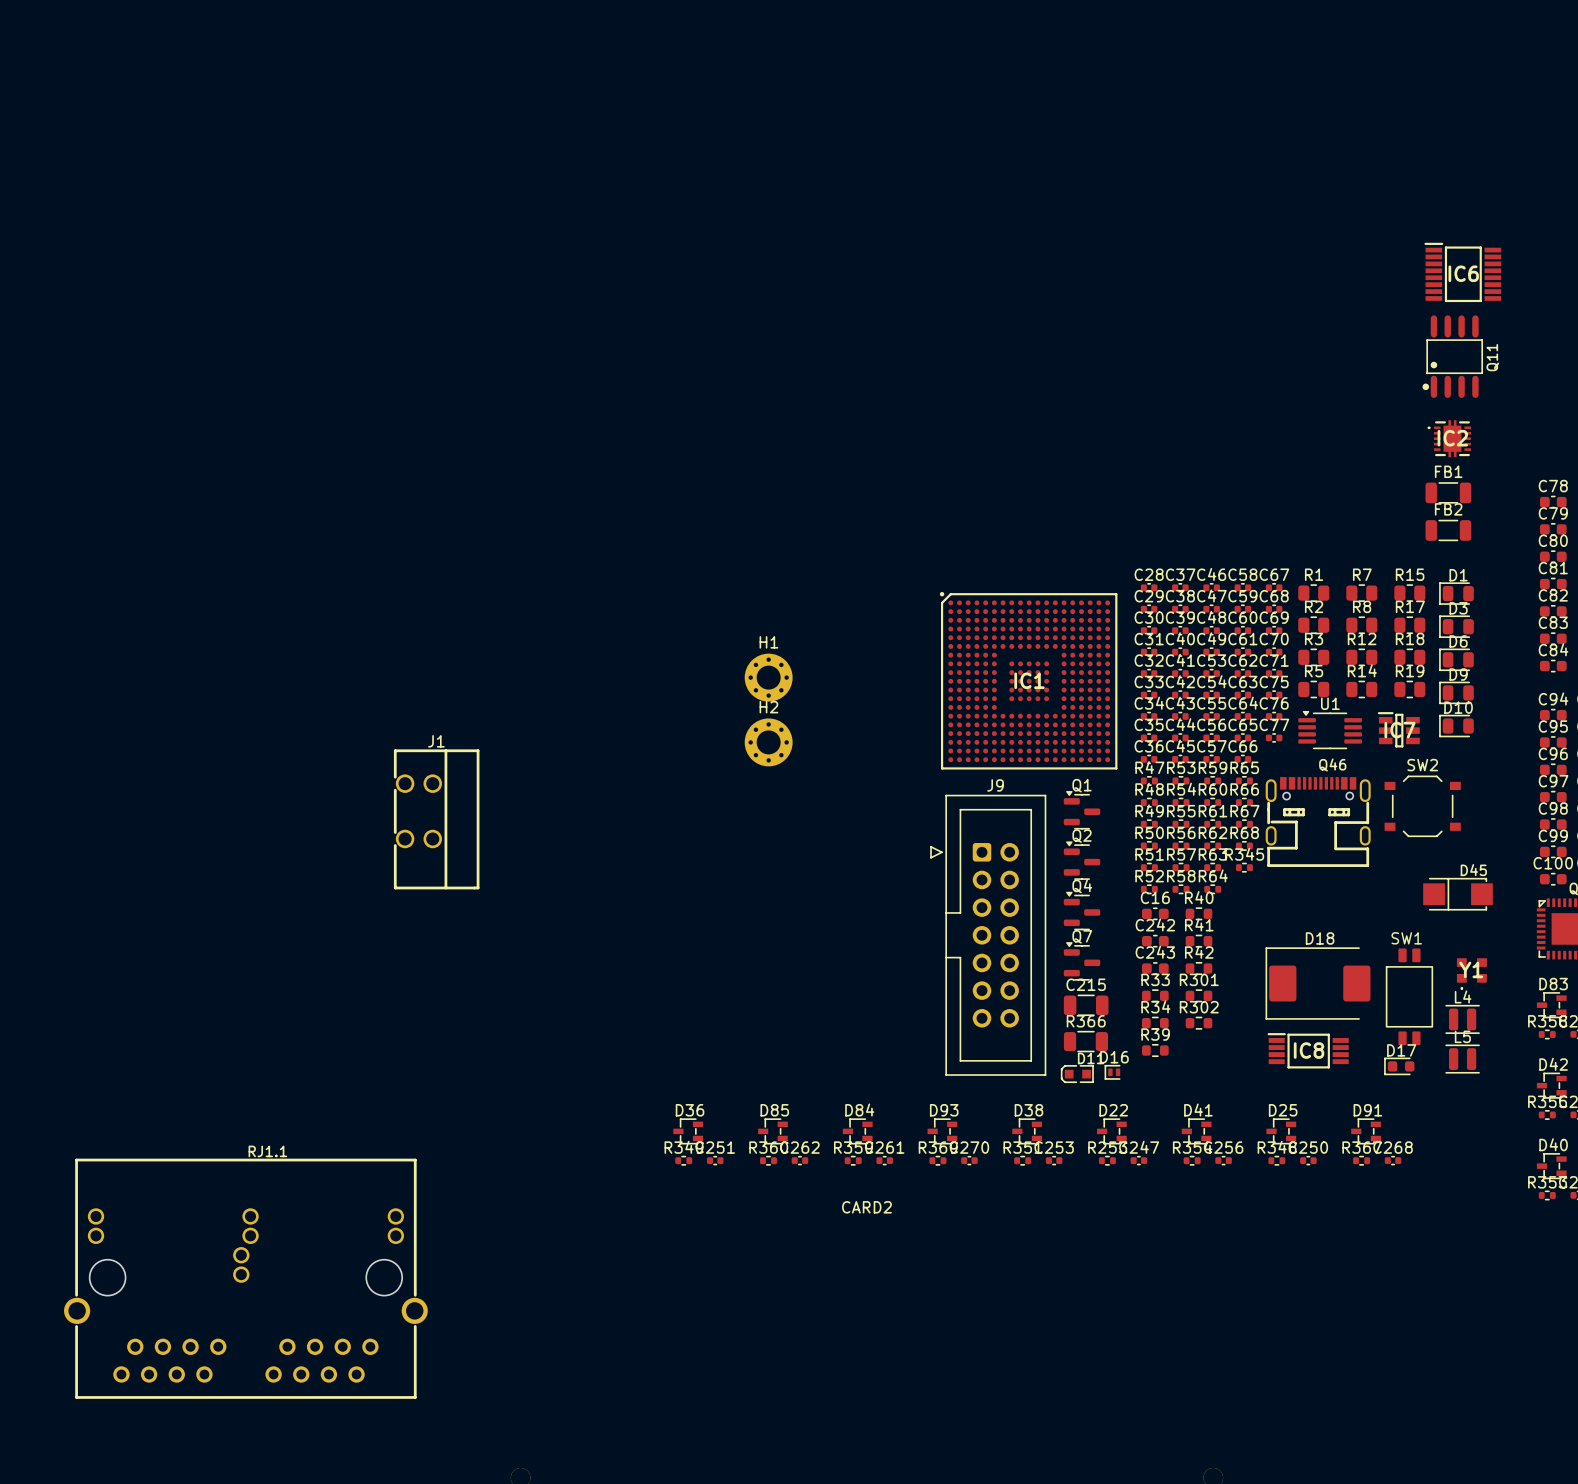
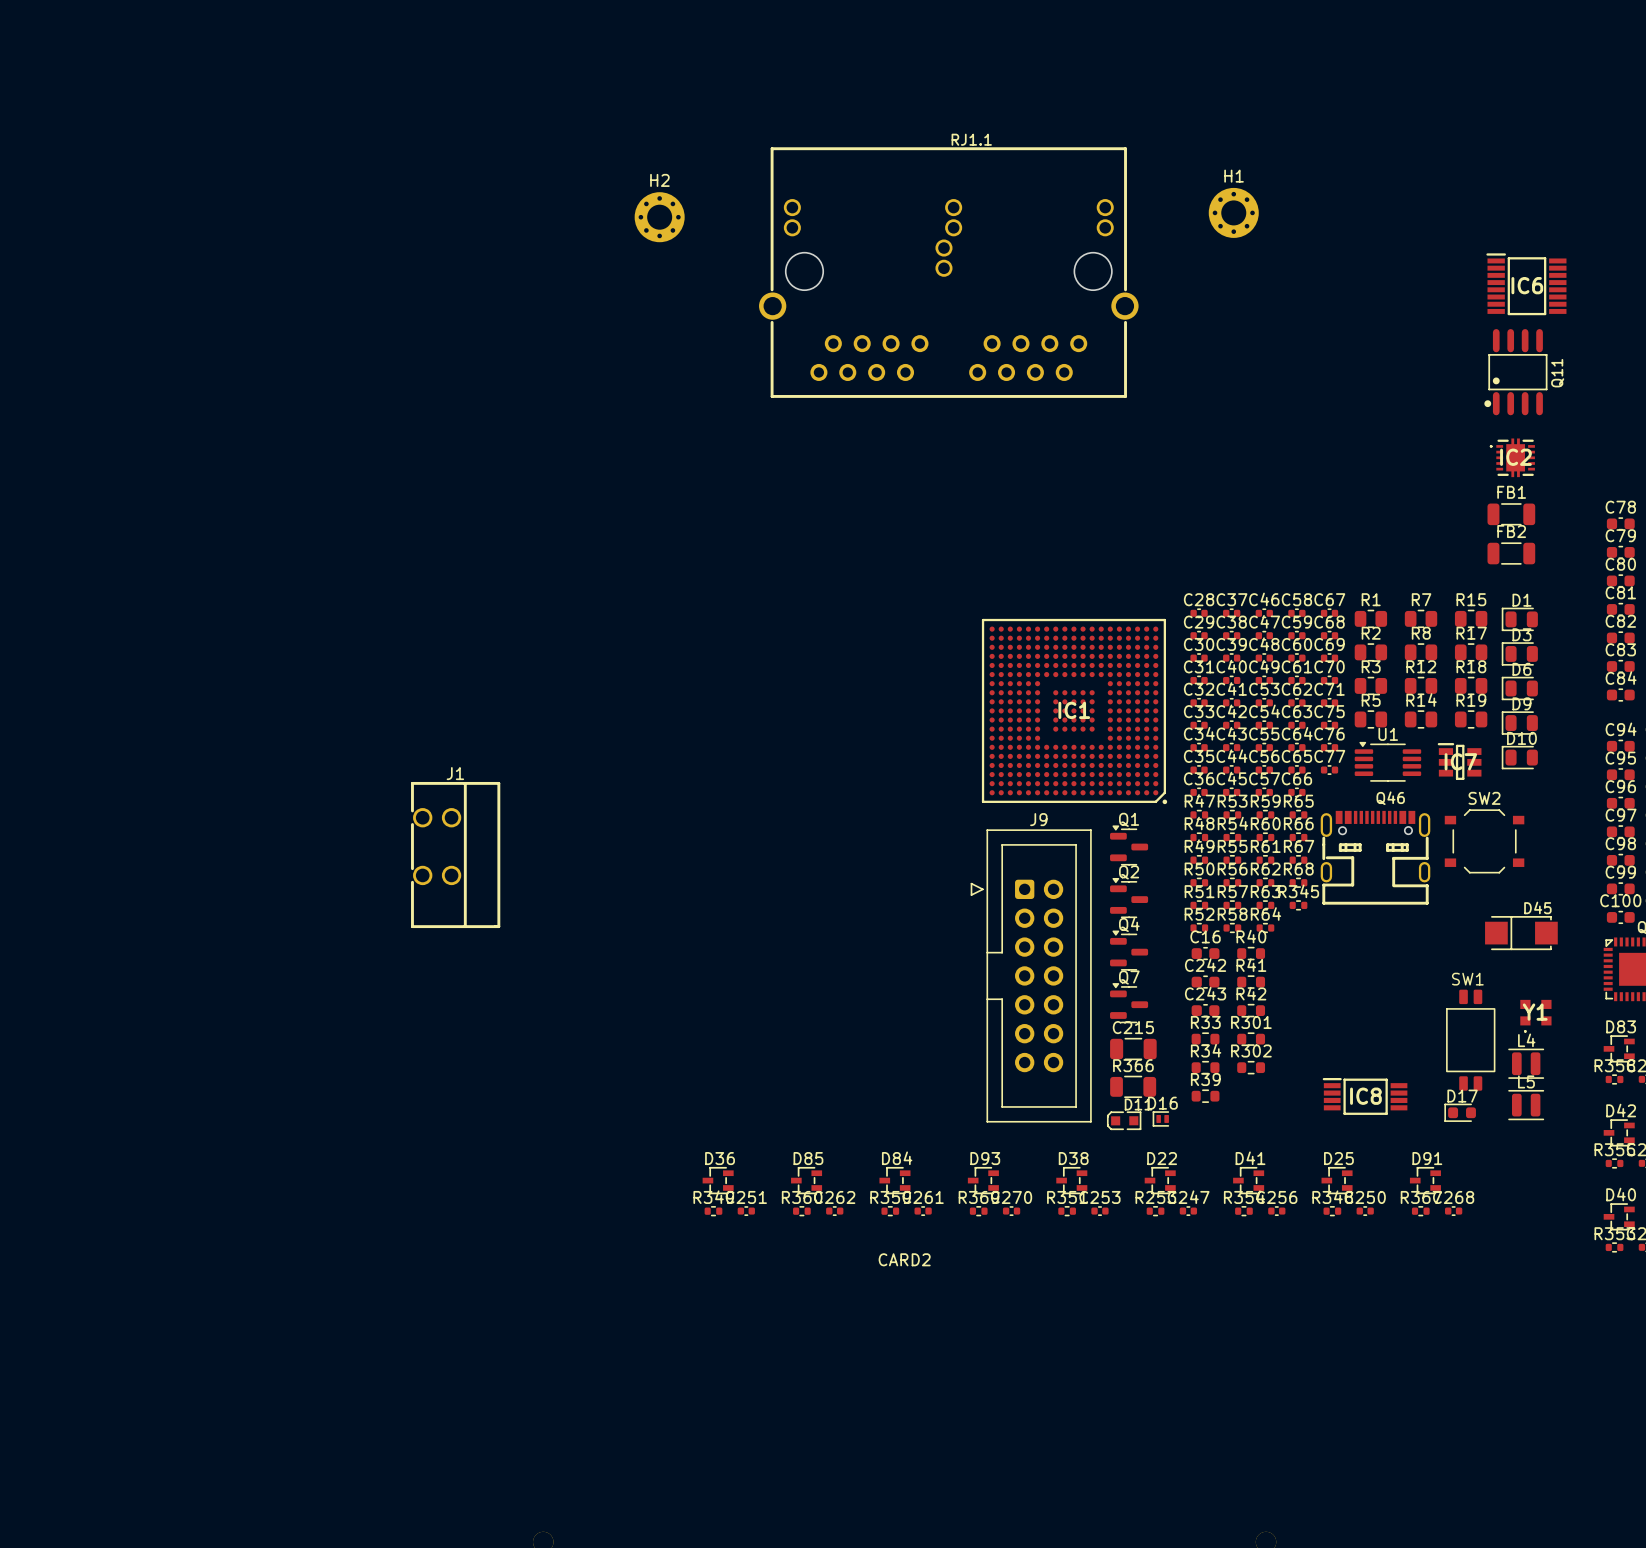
H1 position: (768, 677) -> (1233, 212)
IC1 rotation: 0° (1028, 680) -> 180° (1074, 711)
H2 position: (768, 742) -> (659, 217)
D18: (1318, 983) -> none
RJ1.1 position: (245, 1278) -> (948, 272)

